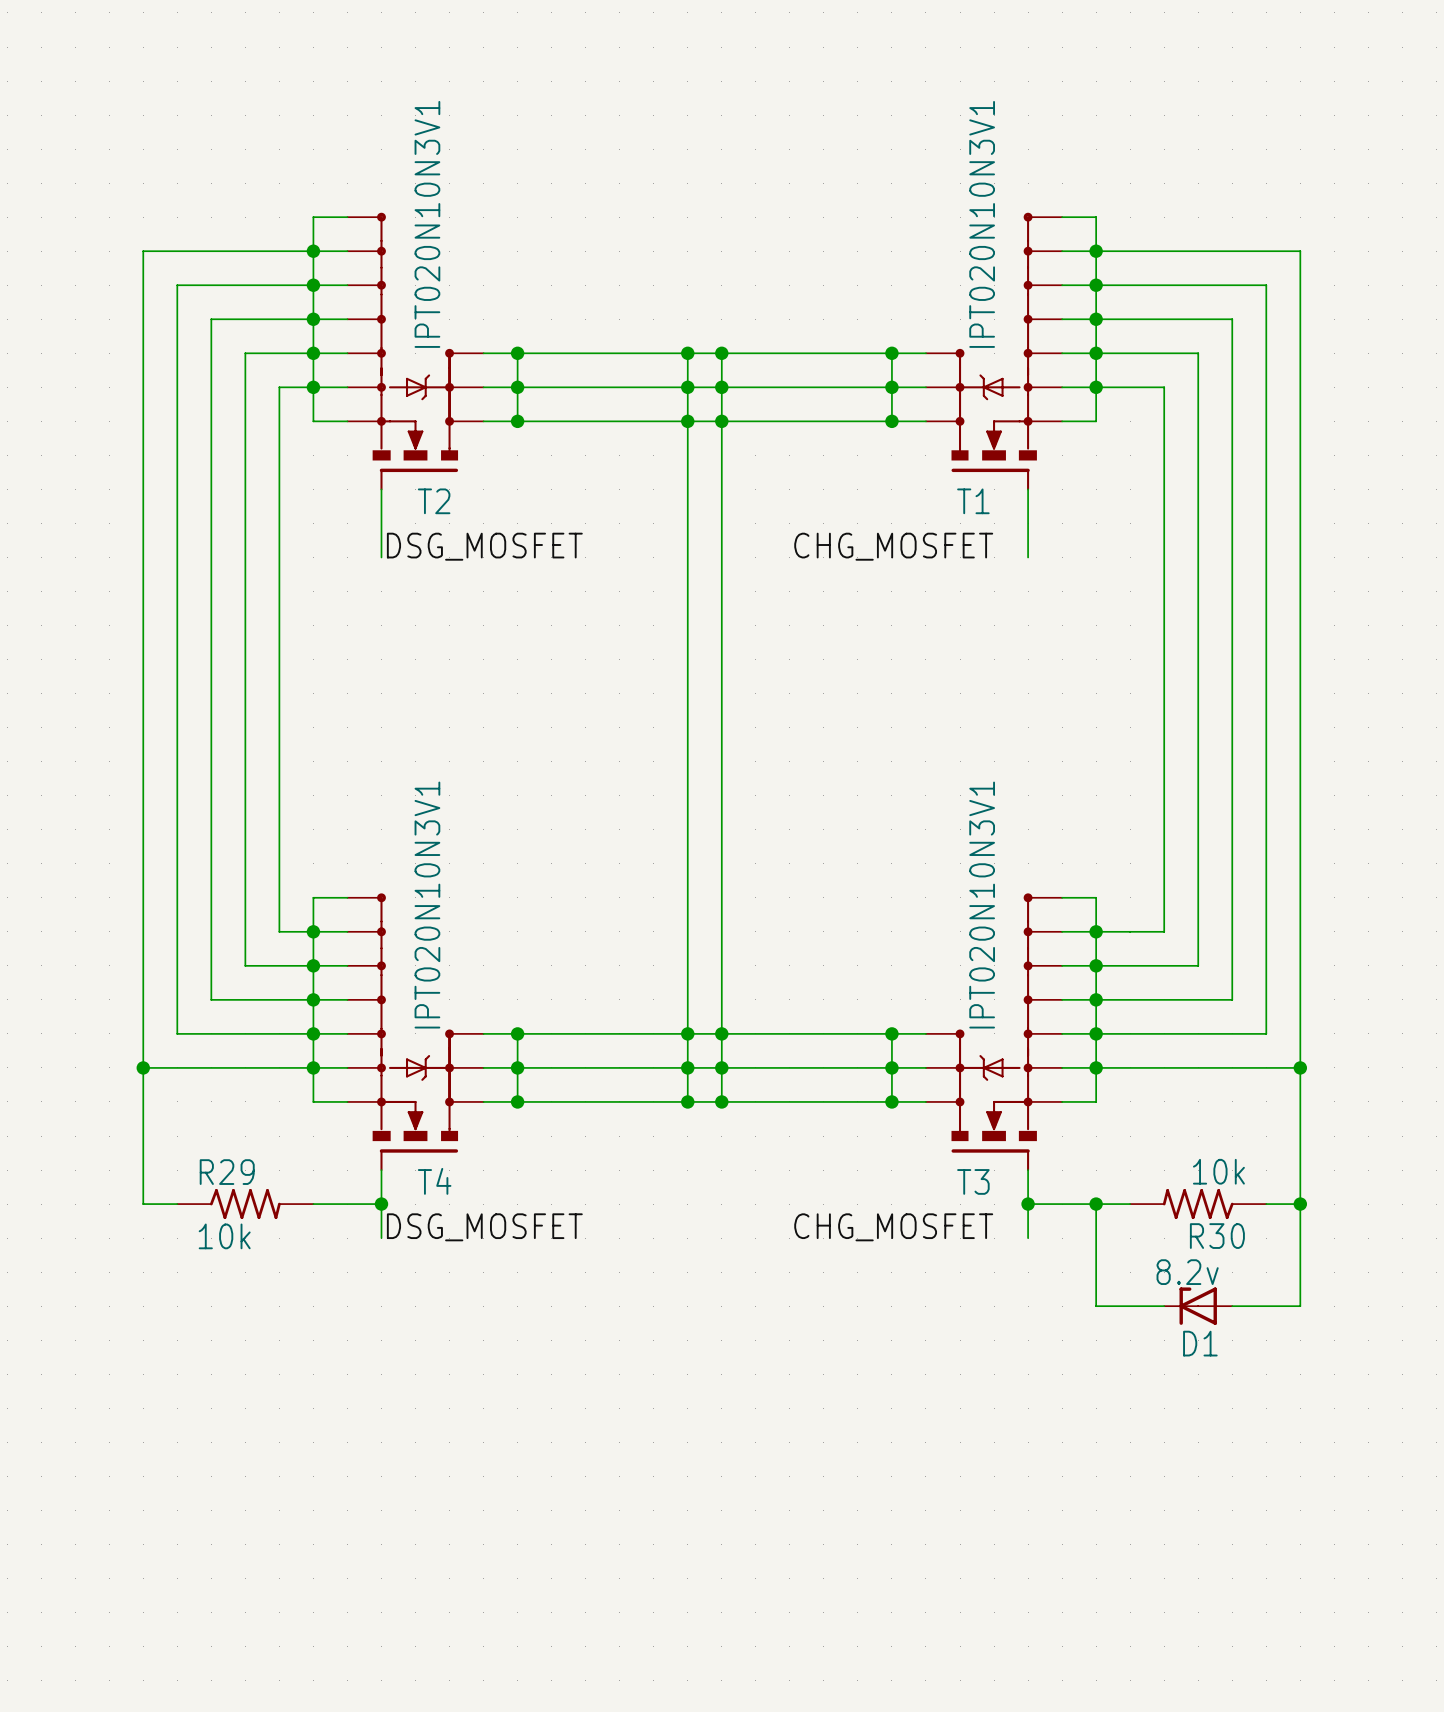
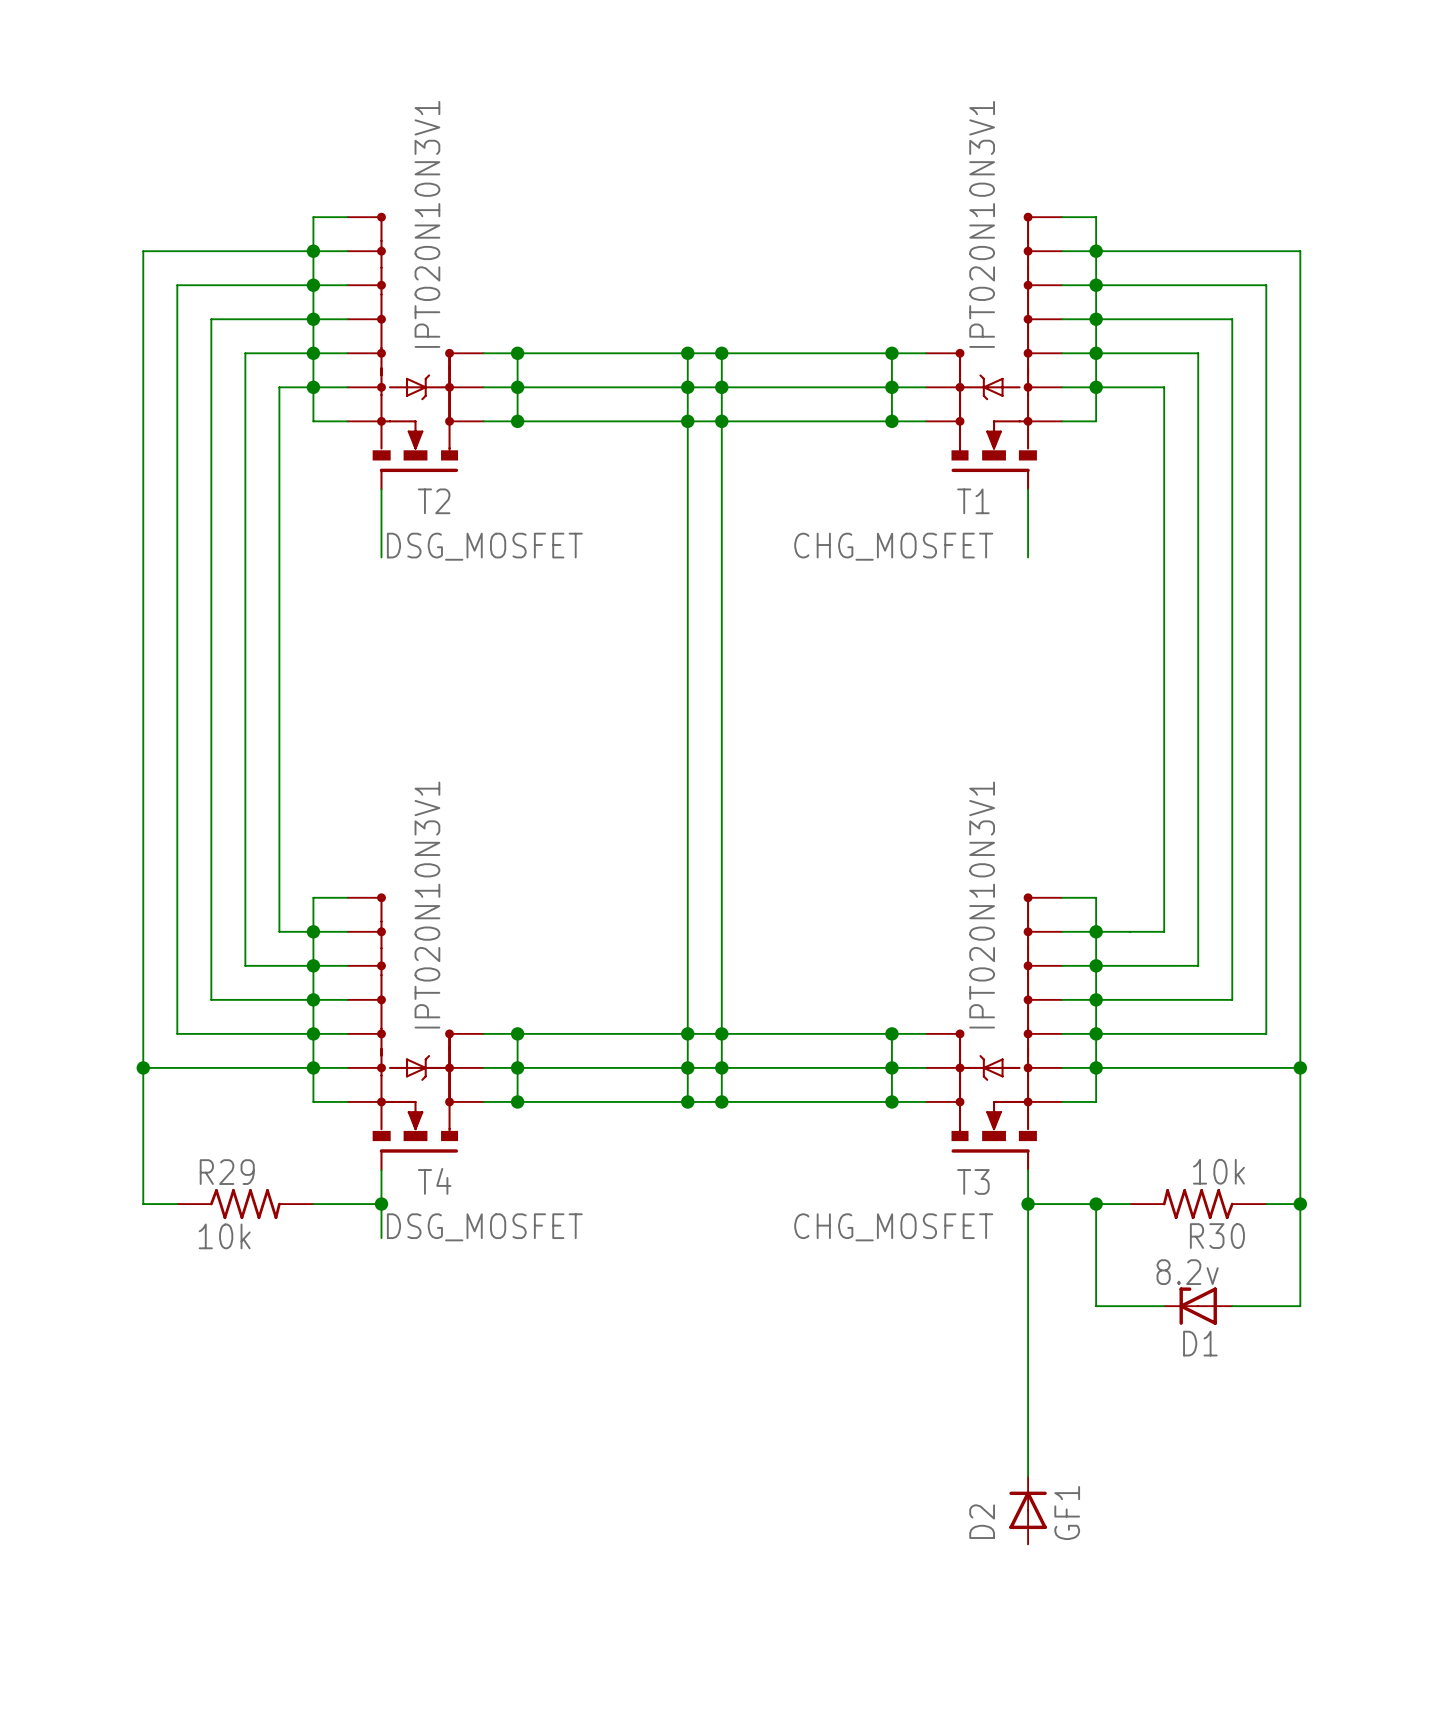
wire: none -> (1028, 1238) (1028, 1476)
D2: none -> GF1 (1028, 1510)

